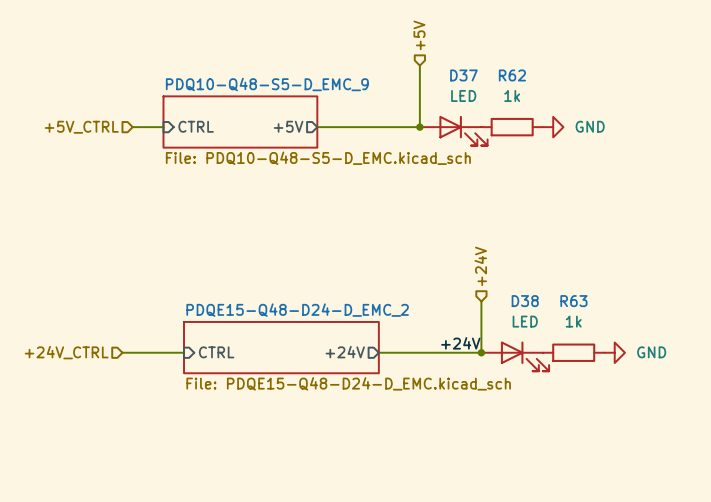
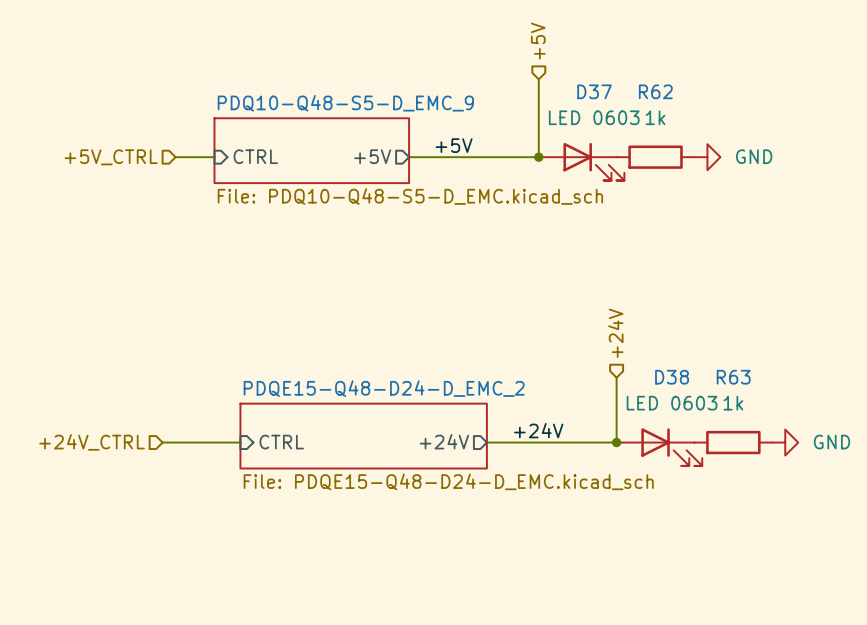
D37 value: LED (463, 95) -> LED 0603 (594, 117)
label: none -> +5V (454, 145)
D38 value: LED (525, 321) -> LED 0603 (672, 403)
label position: +24V (460, 343) -> +24V (538, 430)

